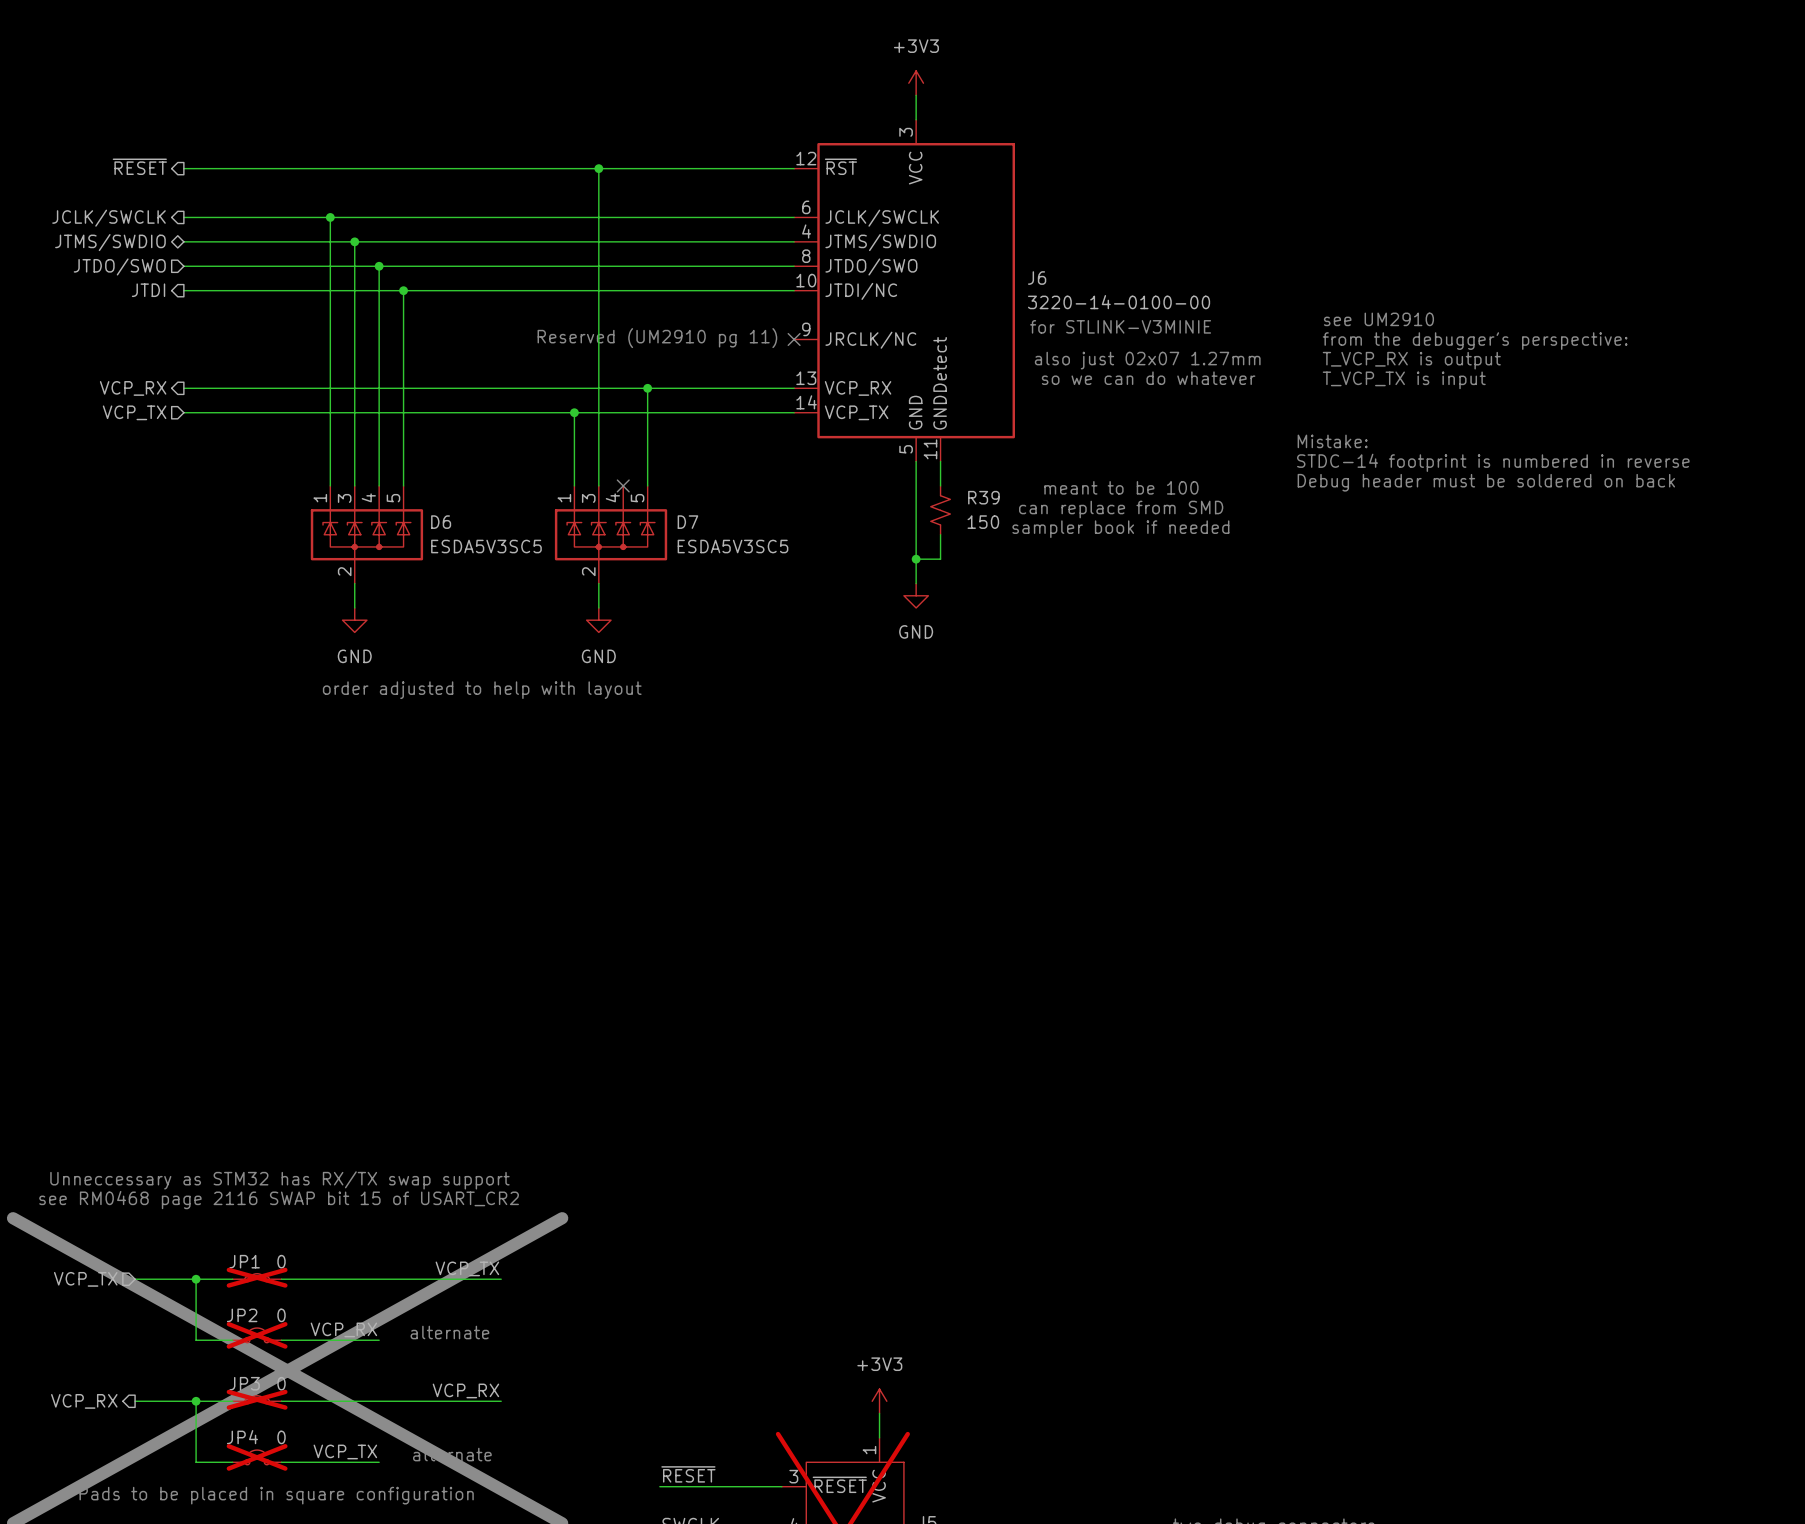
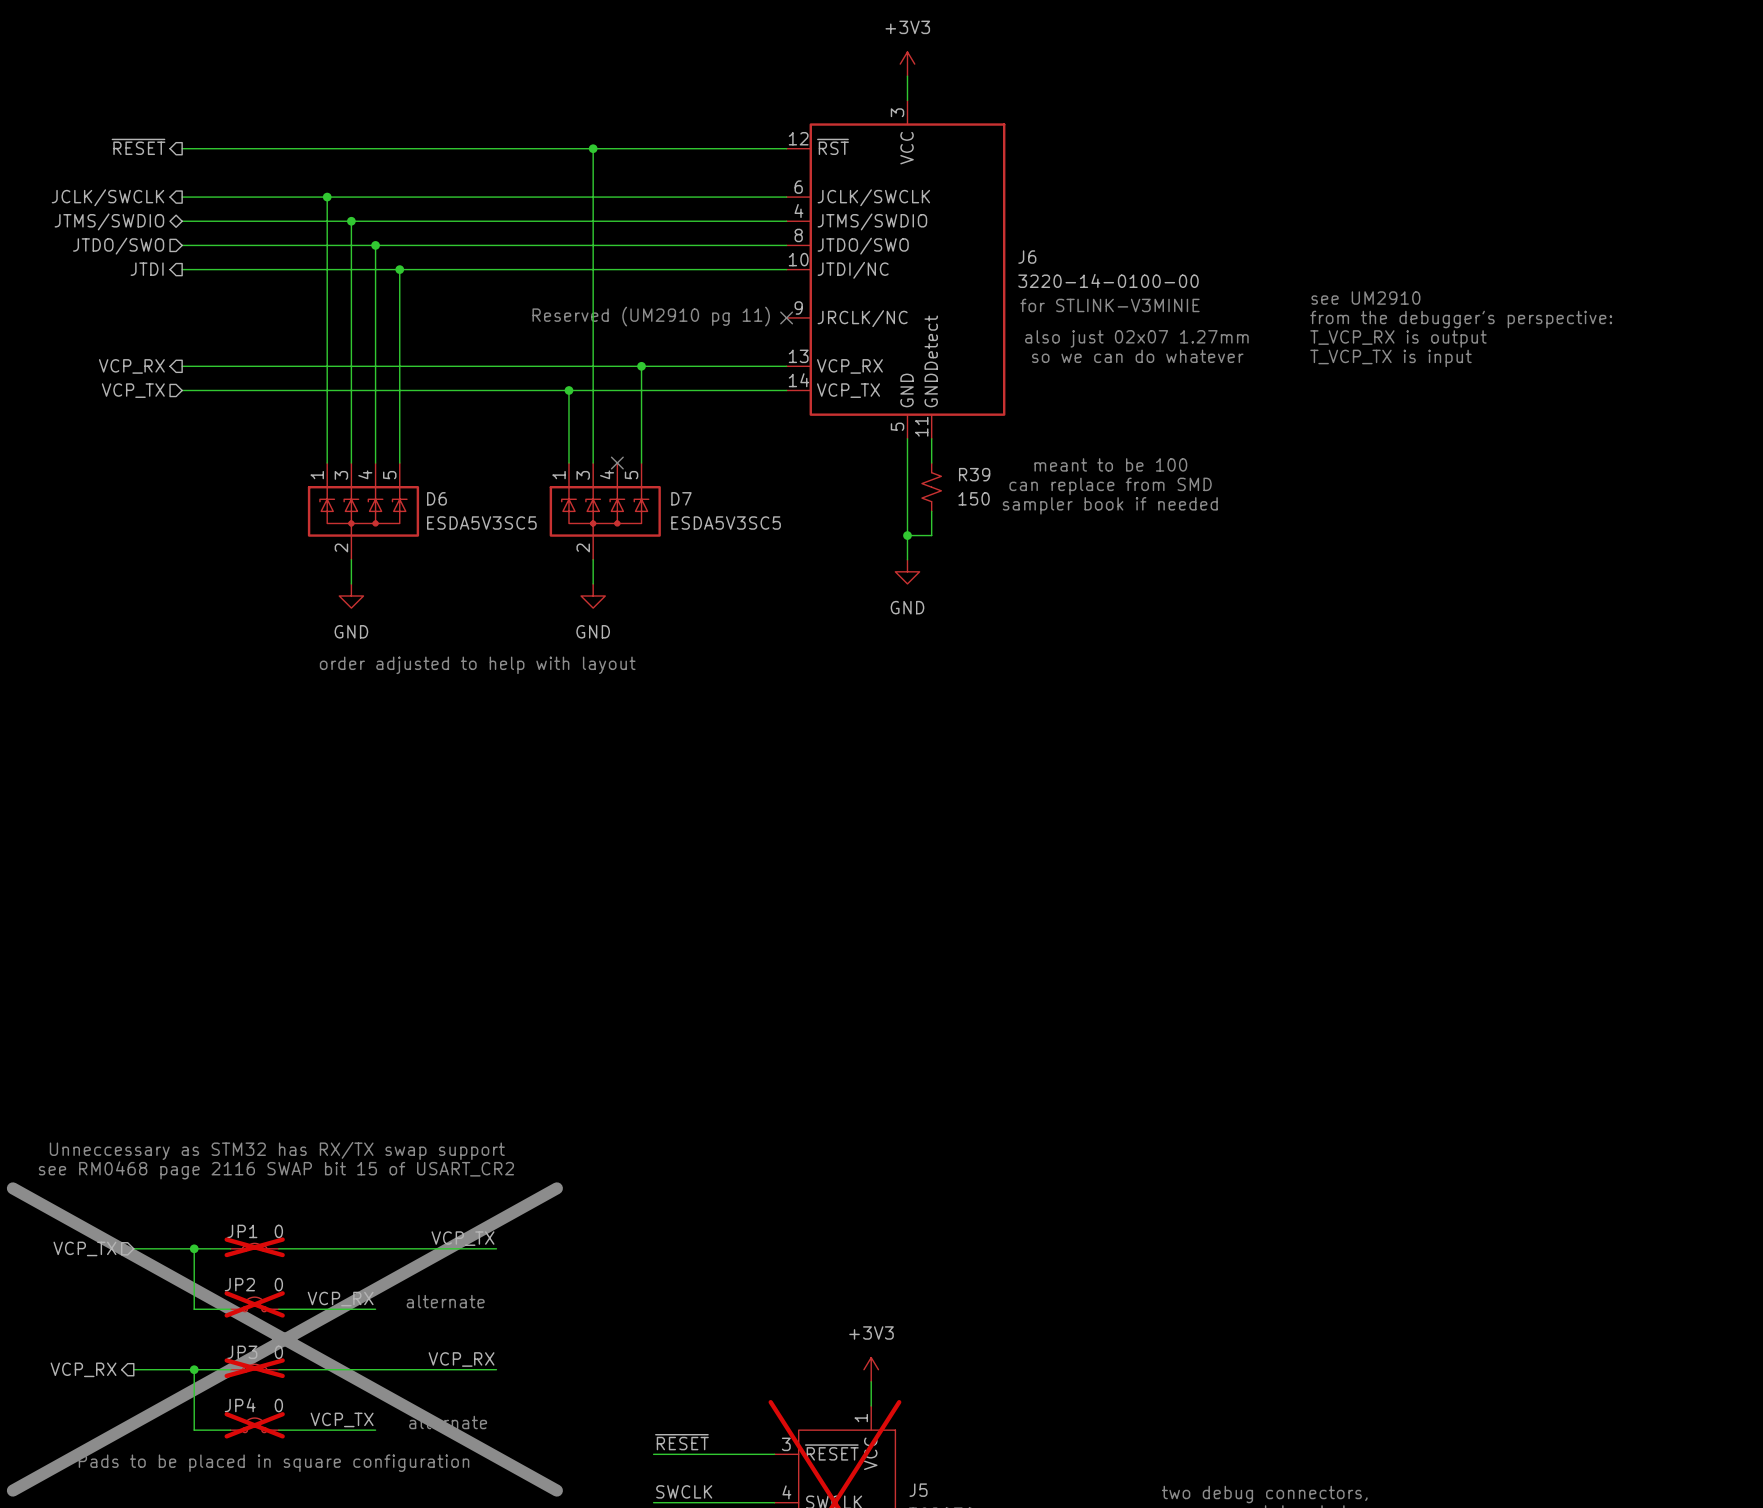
text: Mistake: (1332, 441) -> none
text: STDC-14 footprint is numbered in reverse (1493, 462) -> none
text: Debug header must be soldered on back (1486, 482) -> none

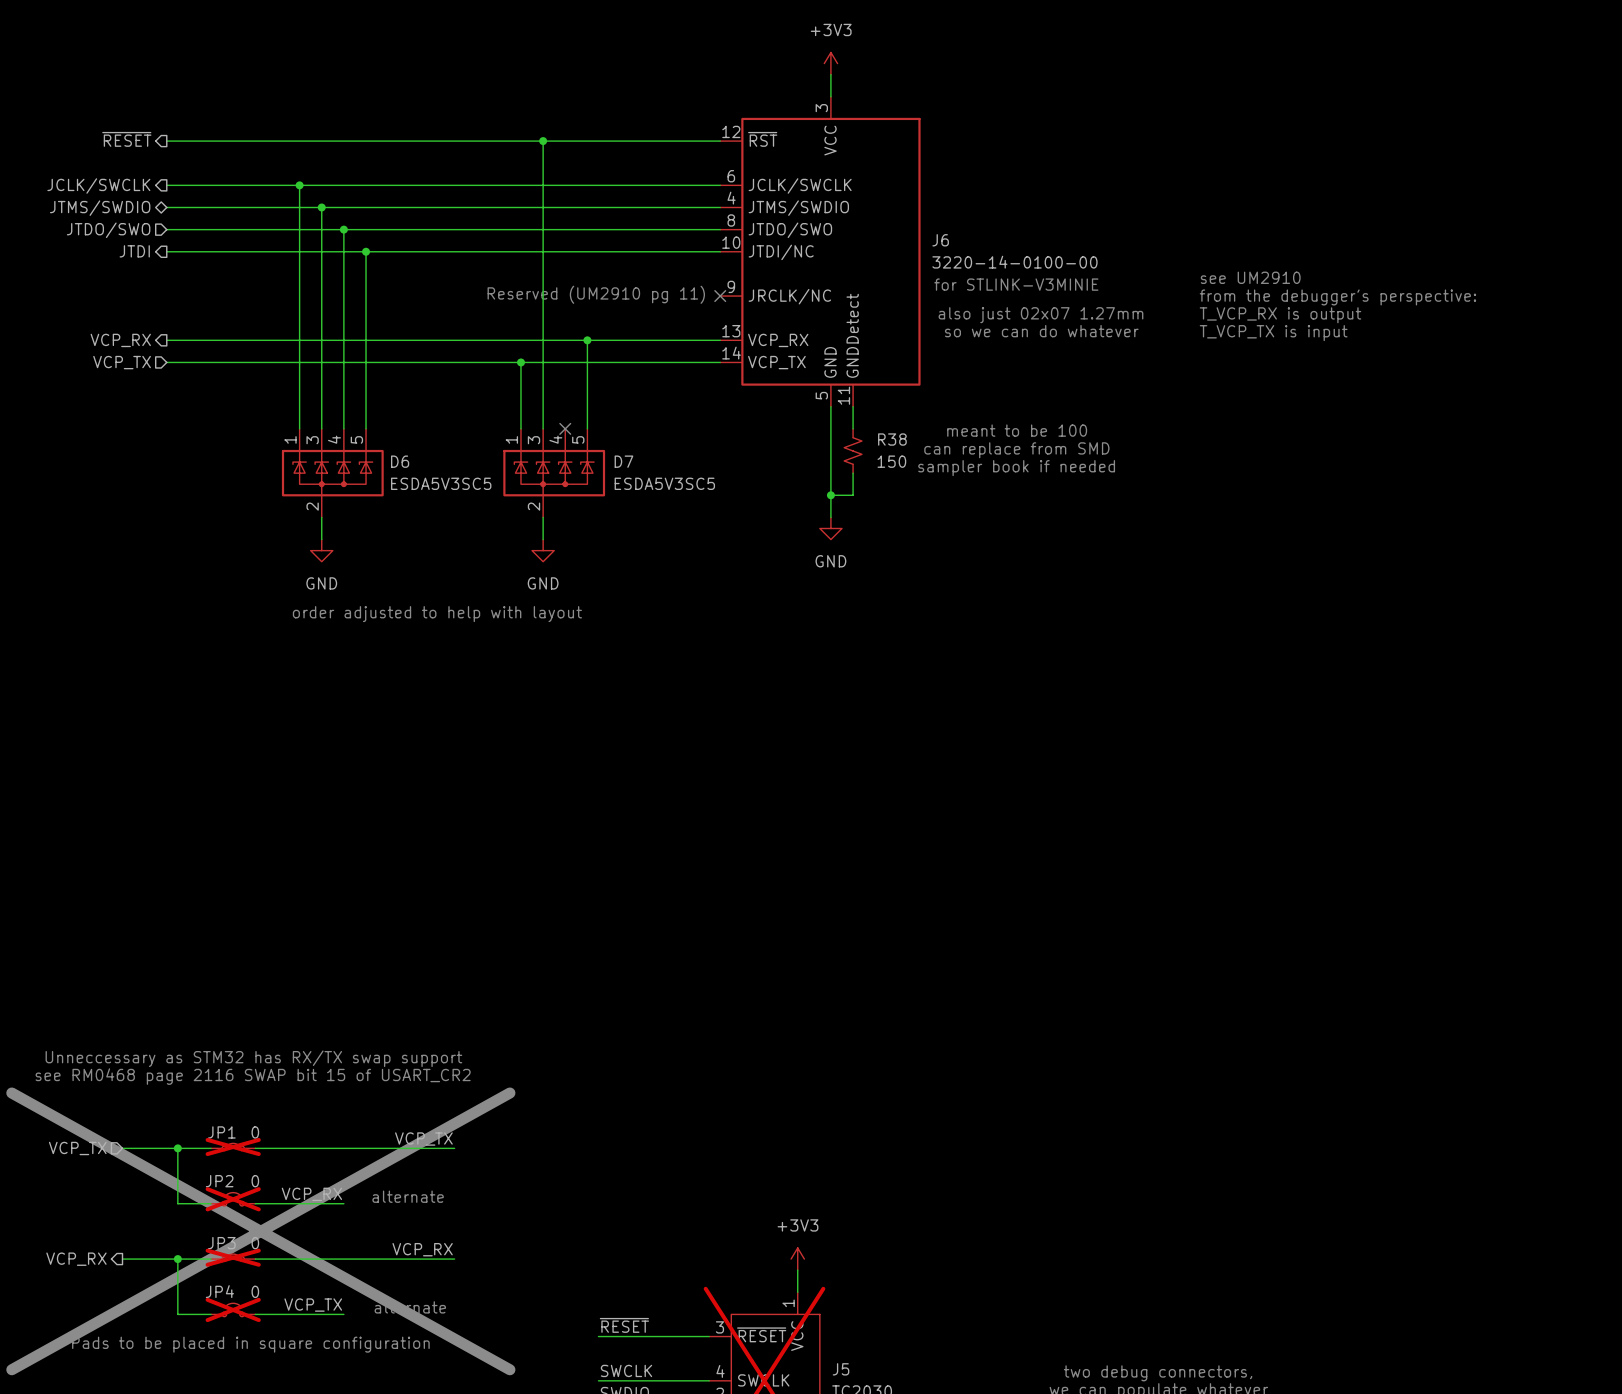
R39 name: R39 (974, 474) -> R38 (892, 439)

